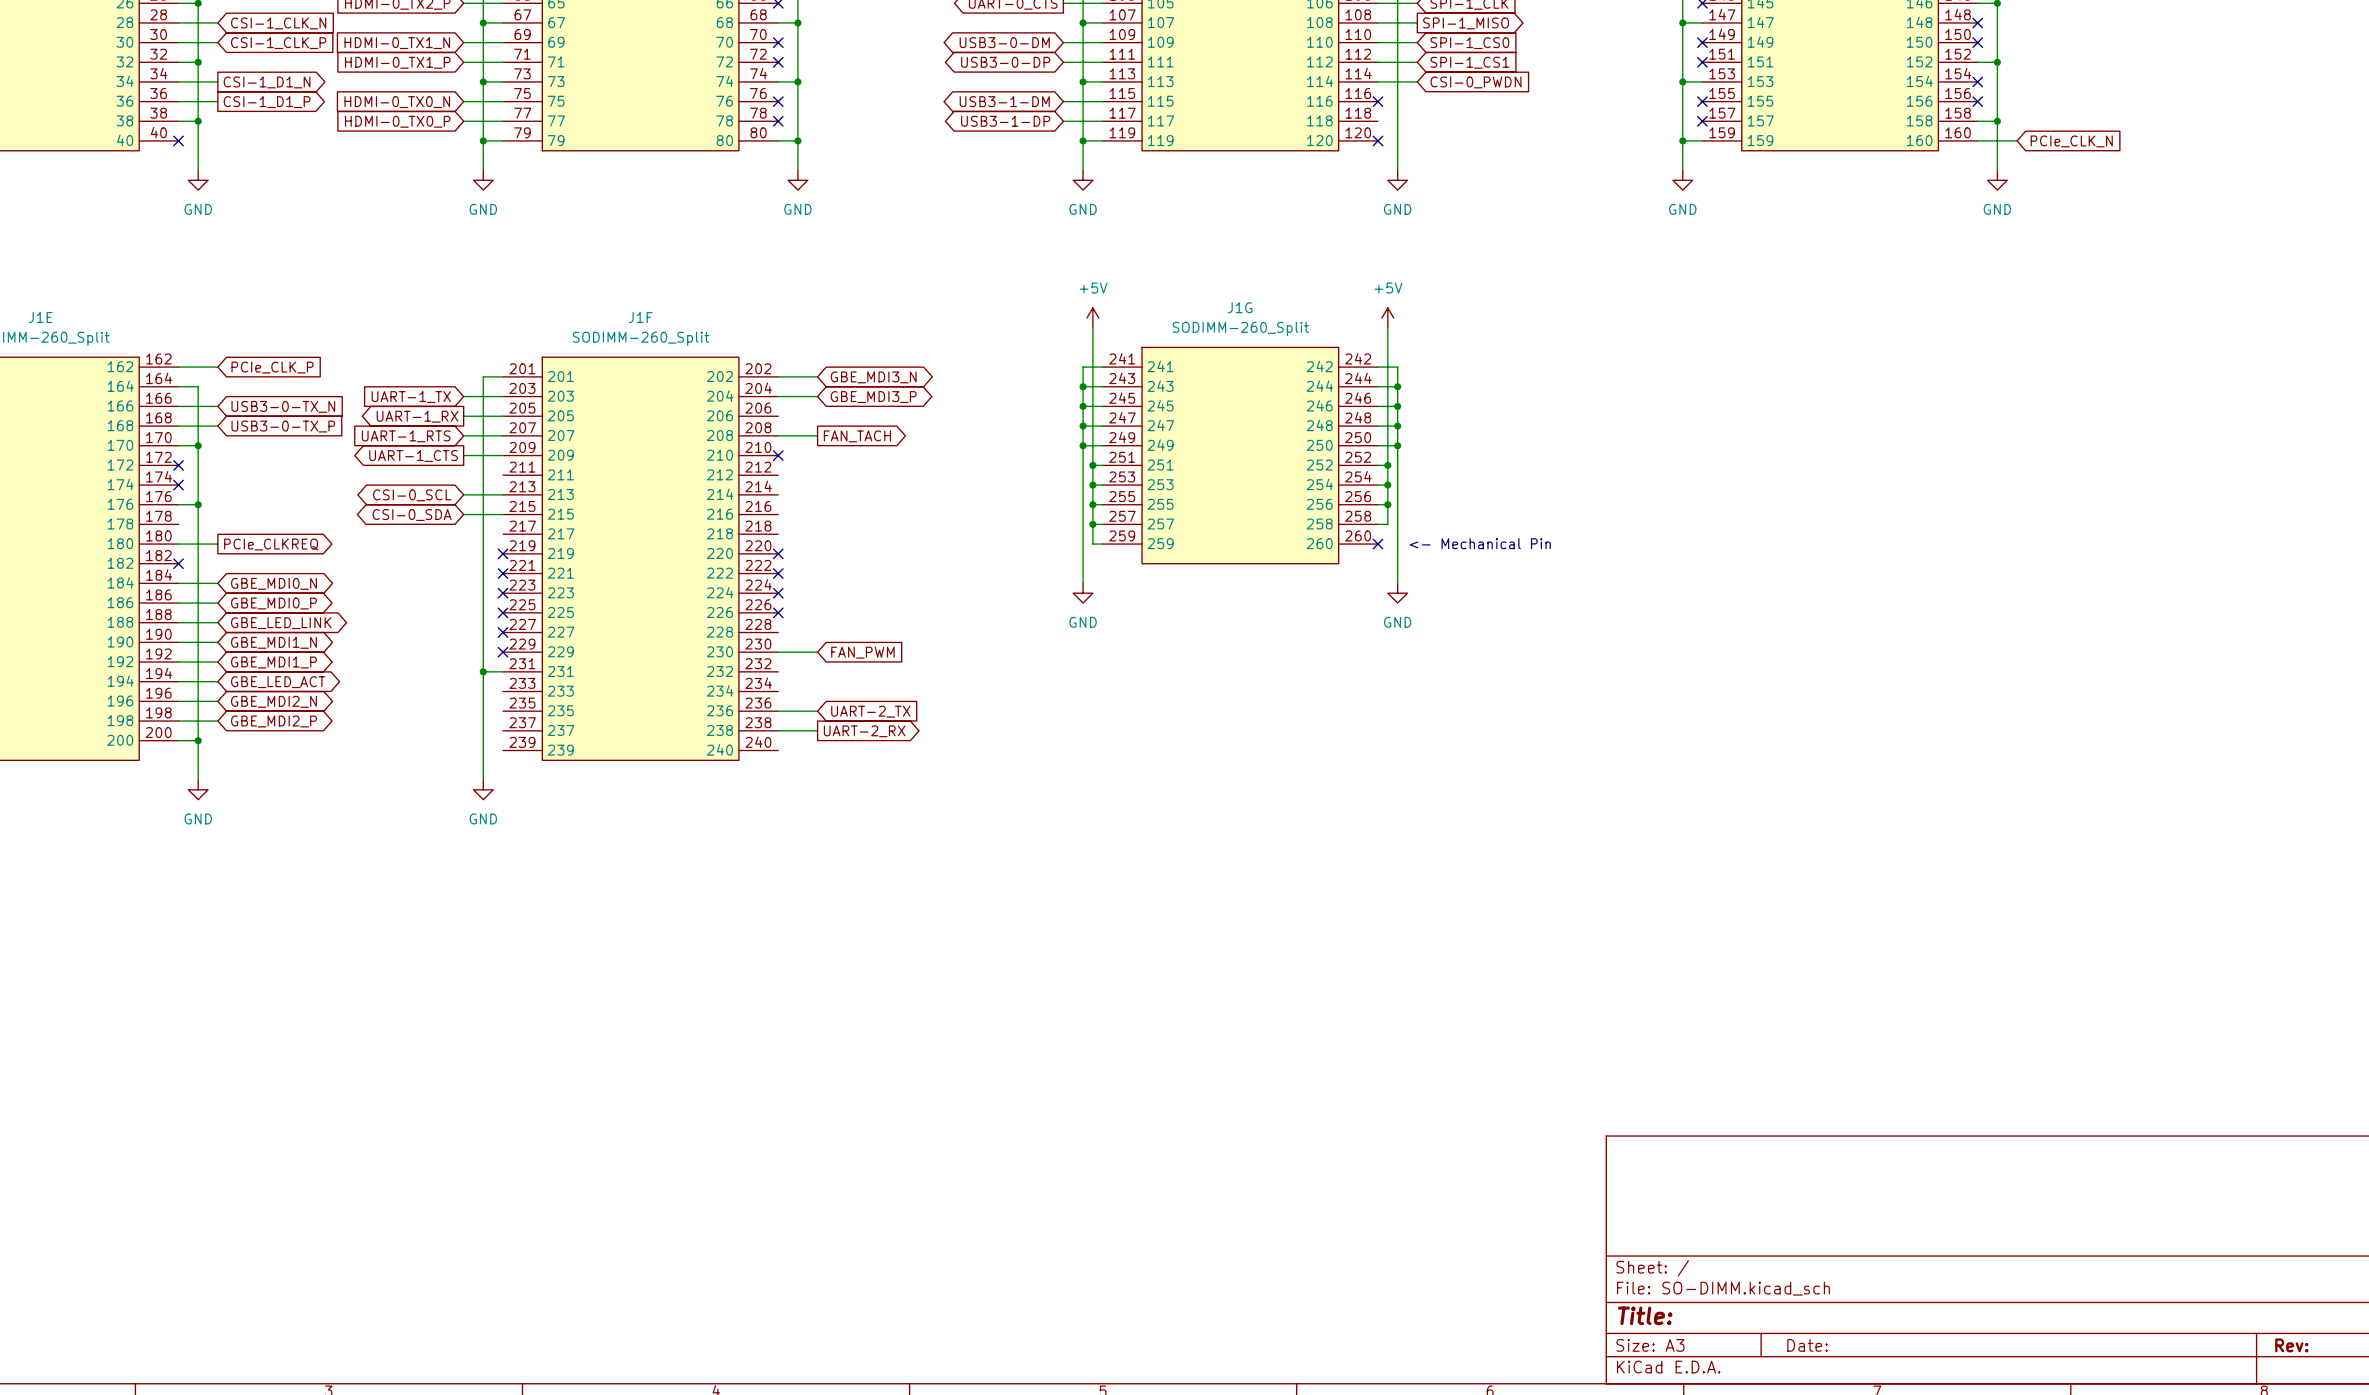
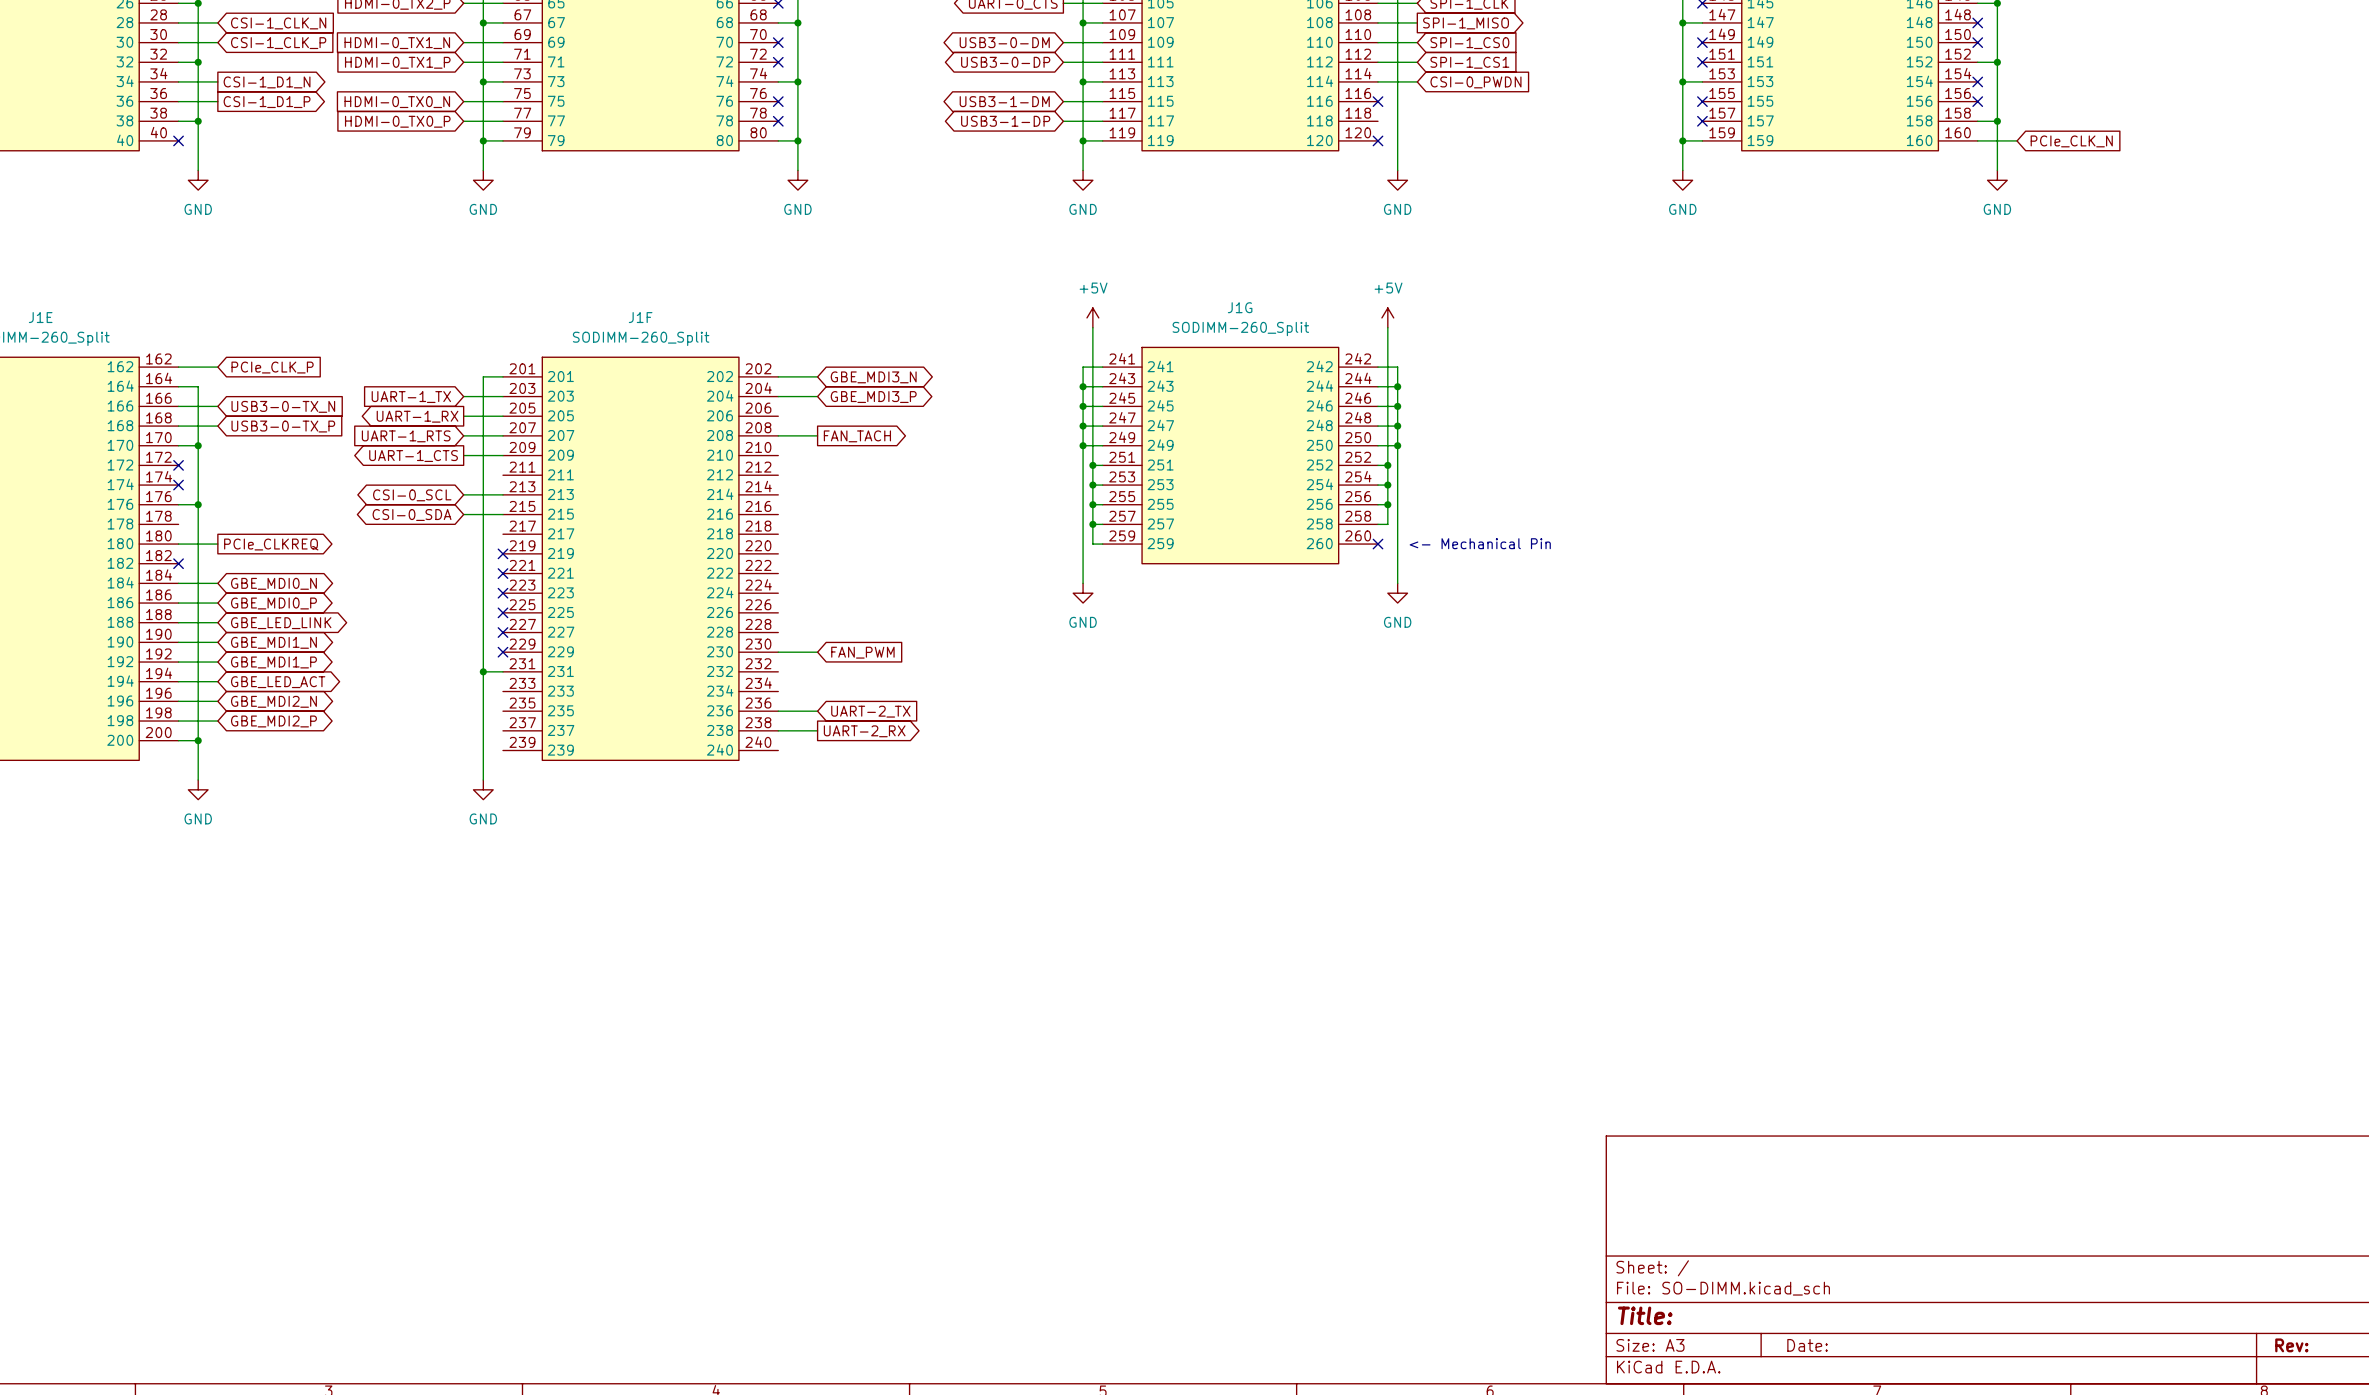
no-connect mark: (778, 455) -> none
no-connect mark: (778, 553) -> none
no-connect mark: (778, 573) -> none
no-connect mark: (778, 593) -> none
no-connect mark: (778, 612) -> none

